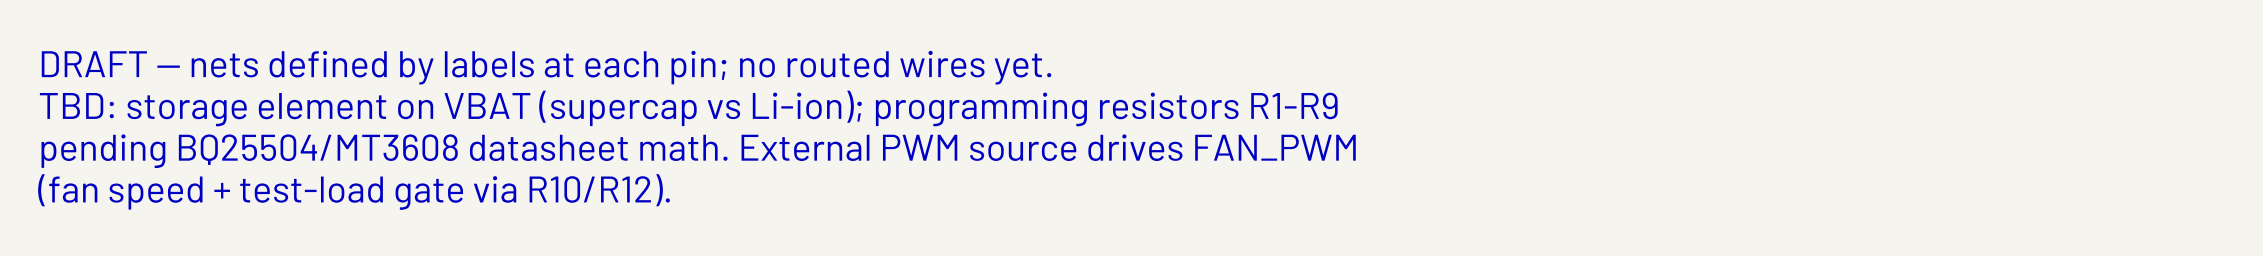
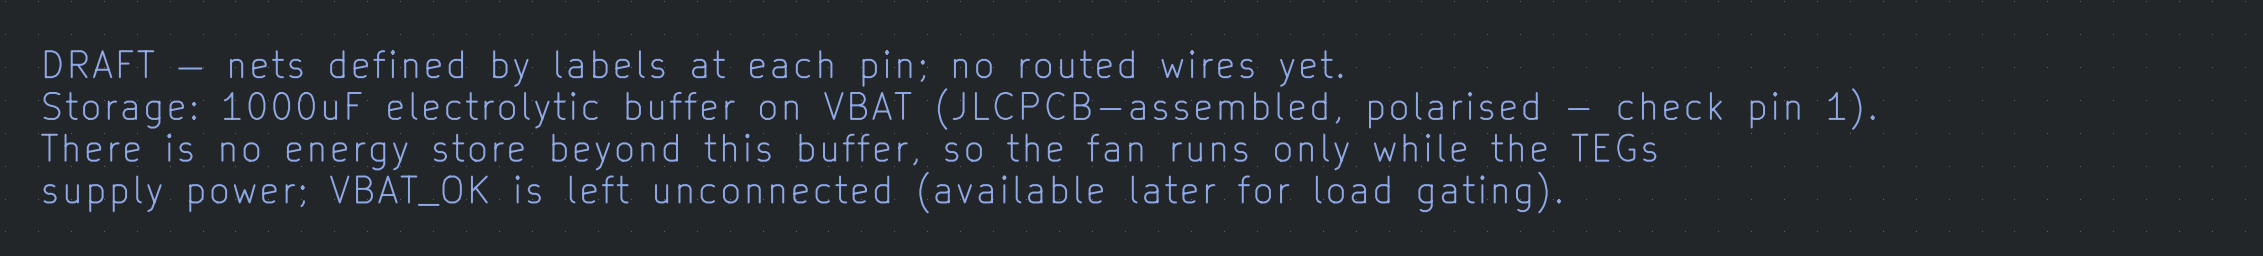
text: TBD: storage element on VBAT (supercap vs Li-ion); programming resistors R1-R9 (688, 108) -> Storage: 1000uF electrolytic buffer on VBAT (JLCPCB-assembled, polarised - check pin 1). (959, 109)
text: pending BQ25504/MT3608 datasheet math. External PWM source drives FAN_PWM (698, 151) -> There is no energy store beyond this buffer, so the fan runs only while the TEGs (848, 152)
text: (fan speed + test-load gate via R10/R12). (354, 192) -> supply power; VBAT_OK is left unconnected (available later for load gating). (802, 192)

